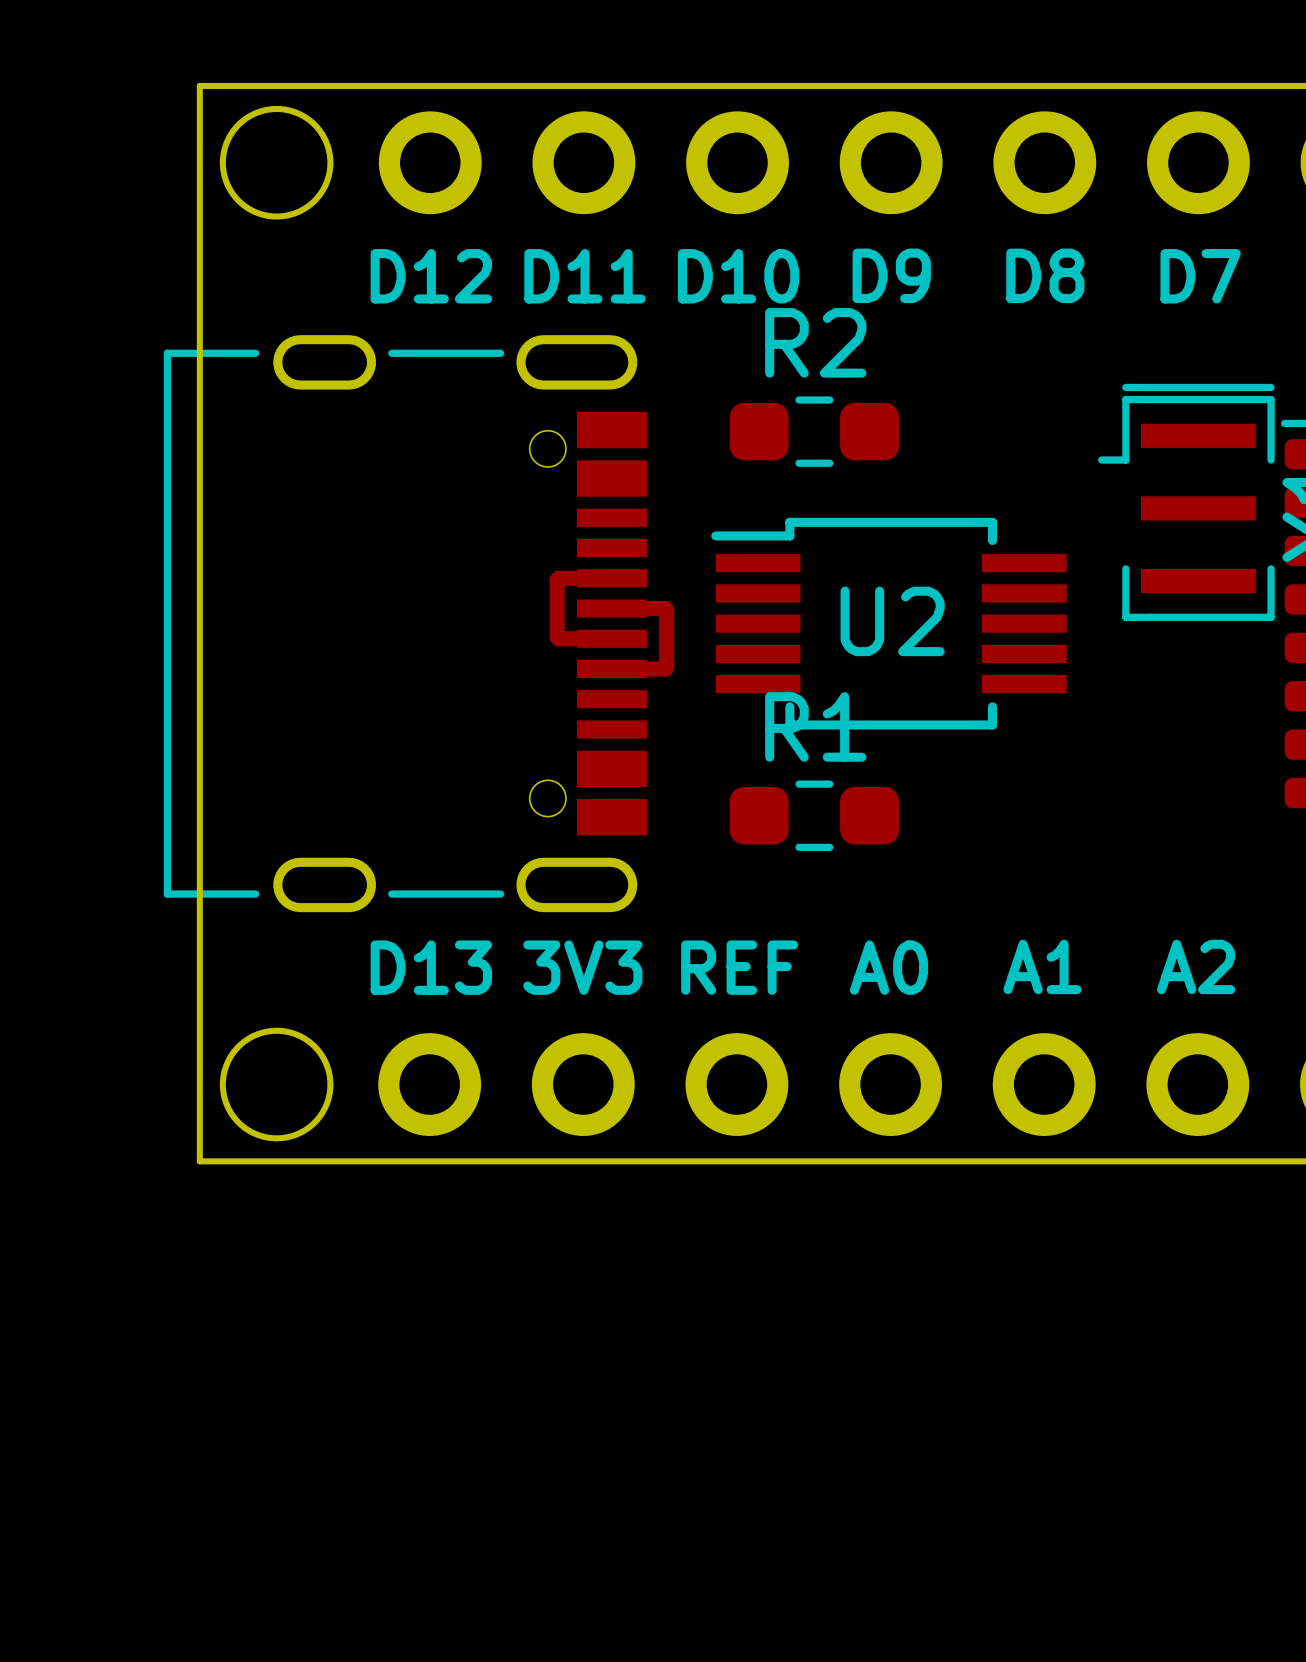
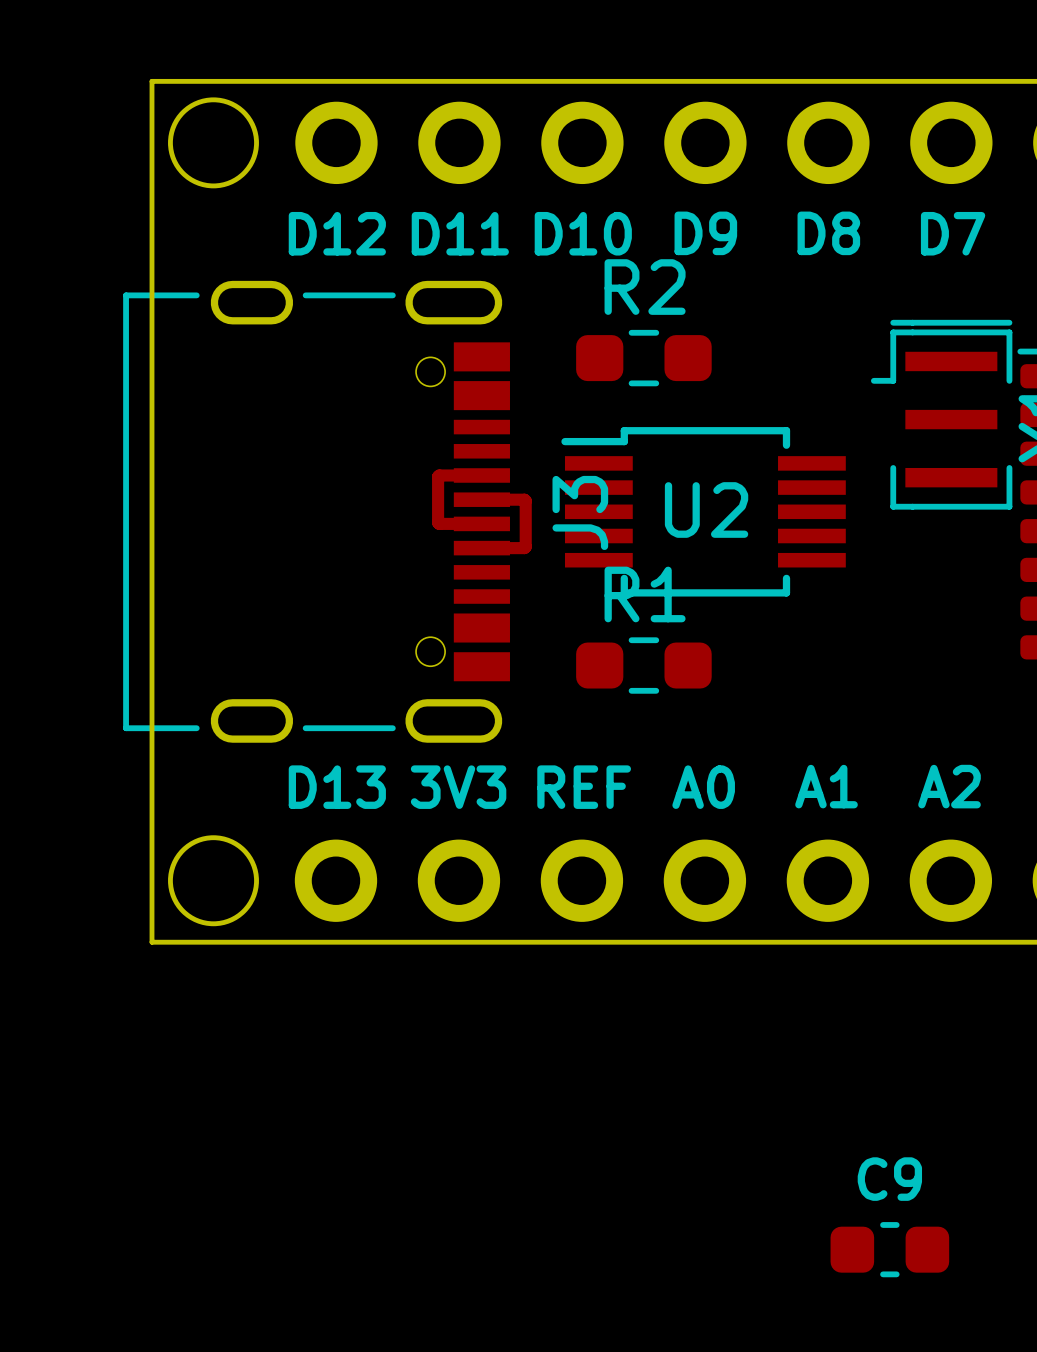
J3 name: none -> J3 (580, 512)
C9: none -> (889, 1249)

